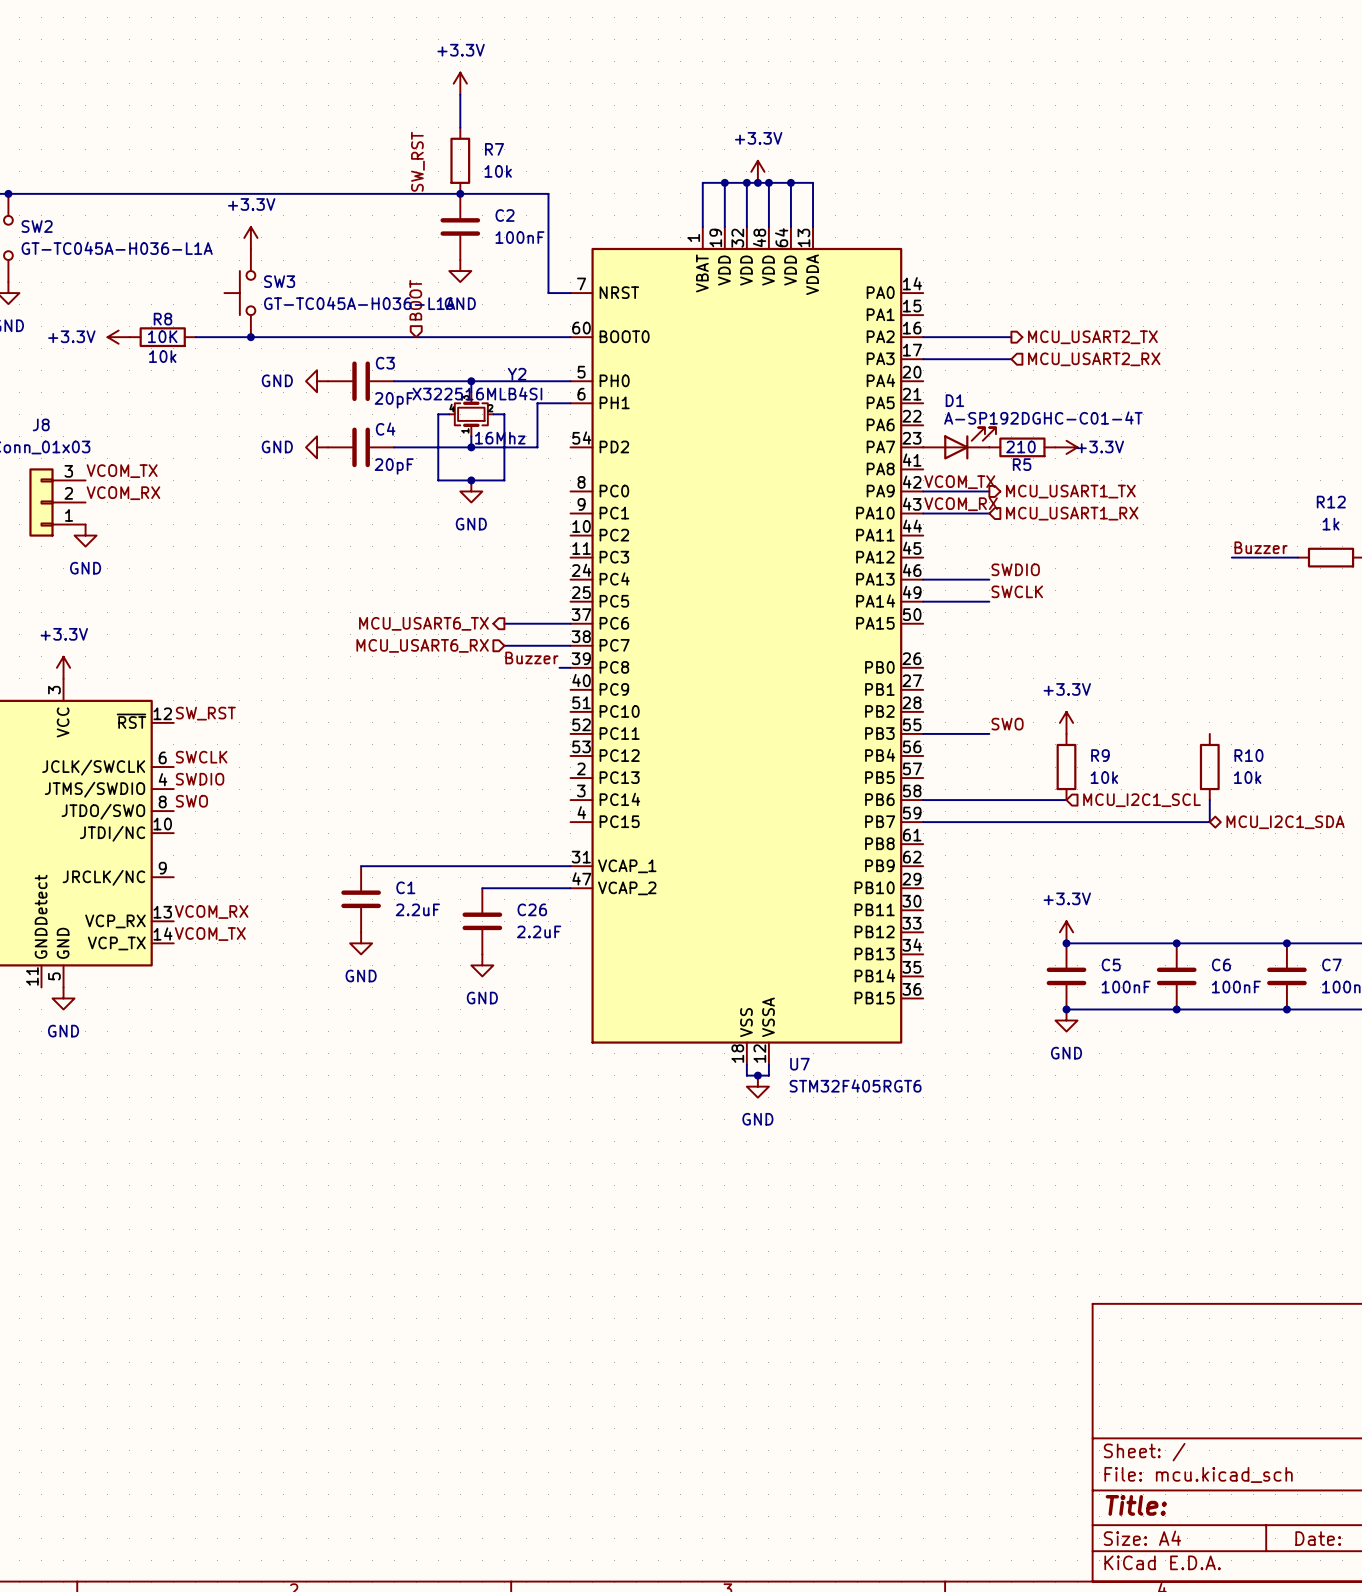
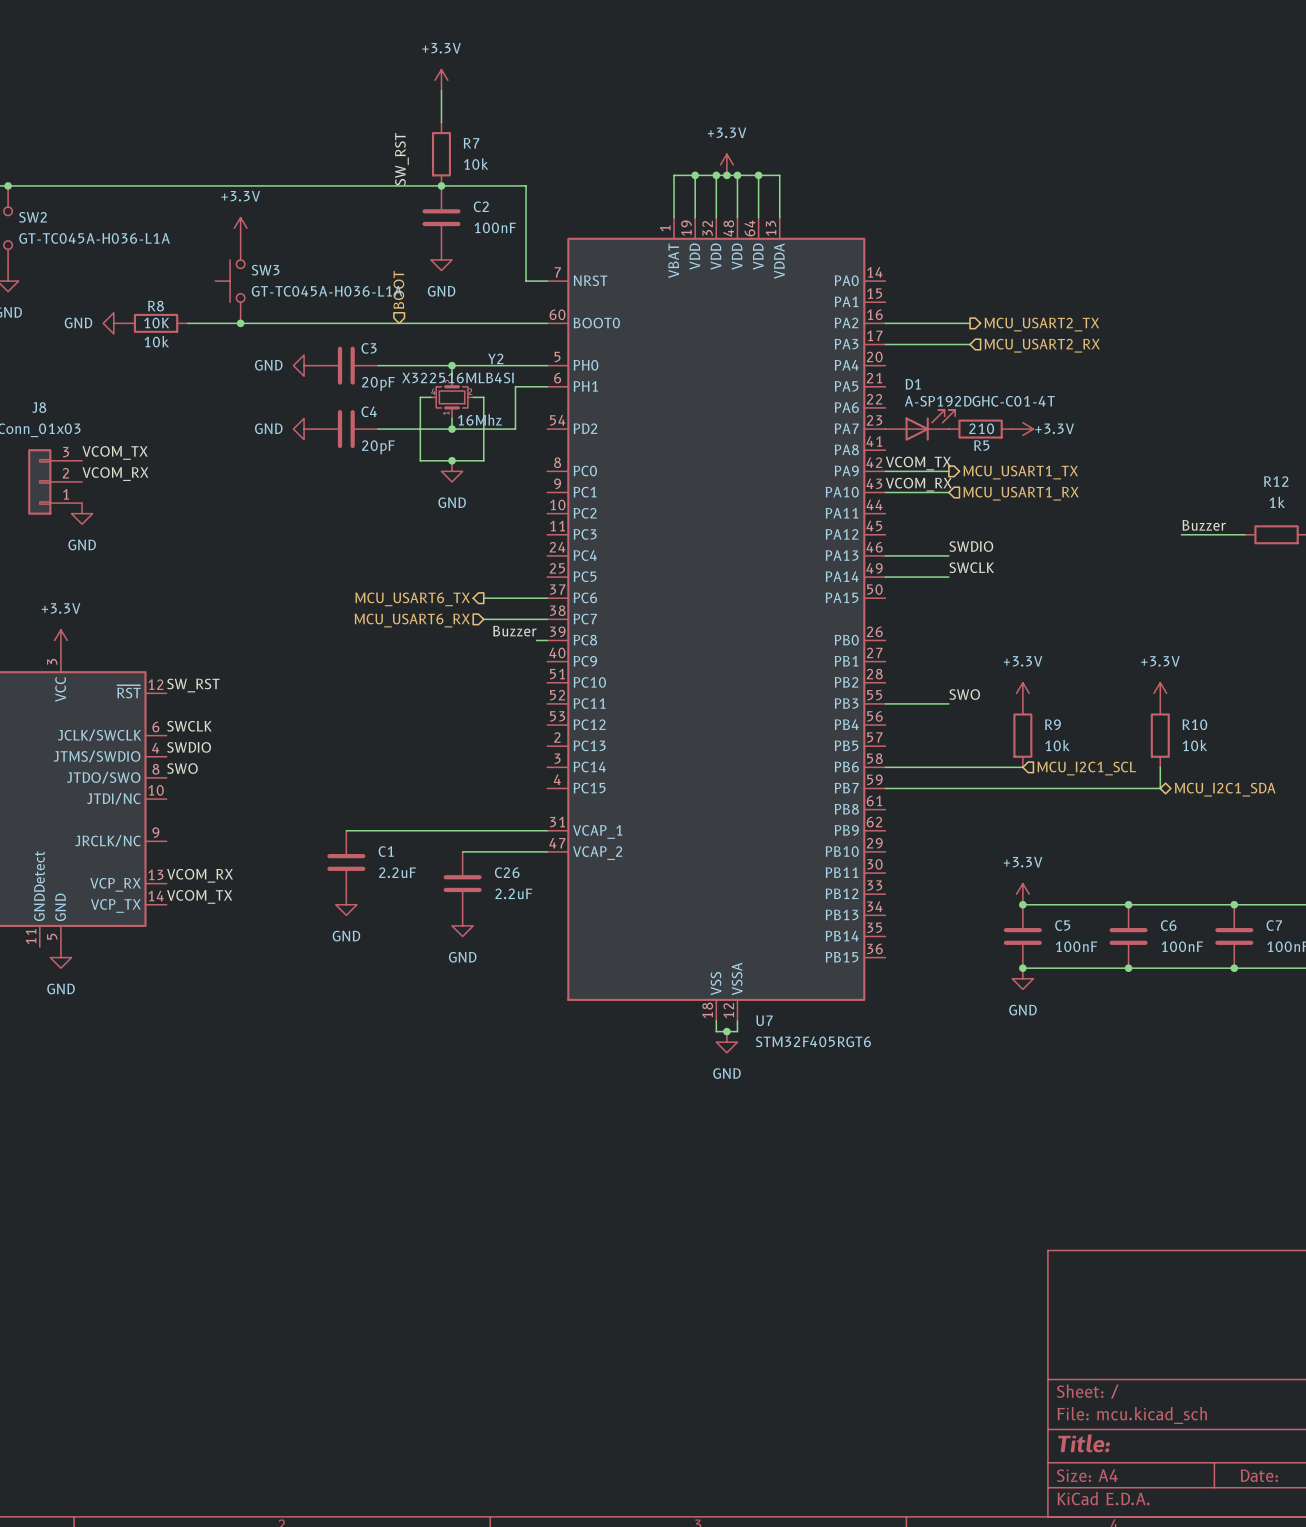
power symbol: +3.3V (118, 337) -> GND (113, 323)
power symbol: none -> +3.3V (1160, 693)

